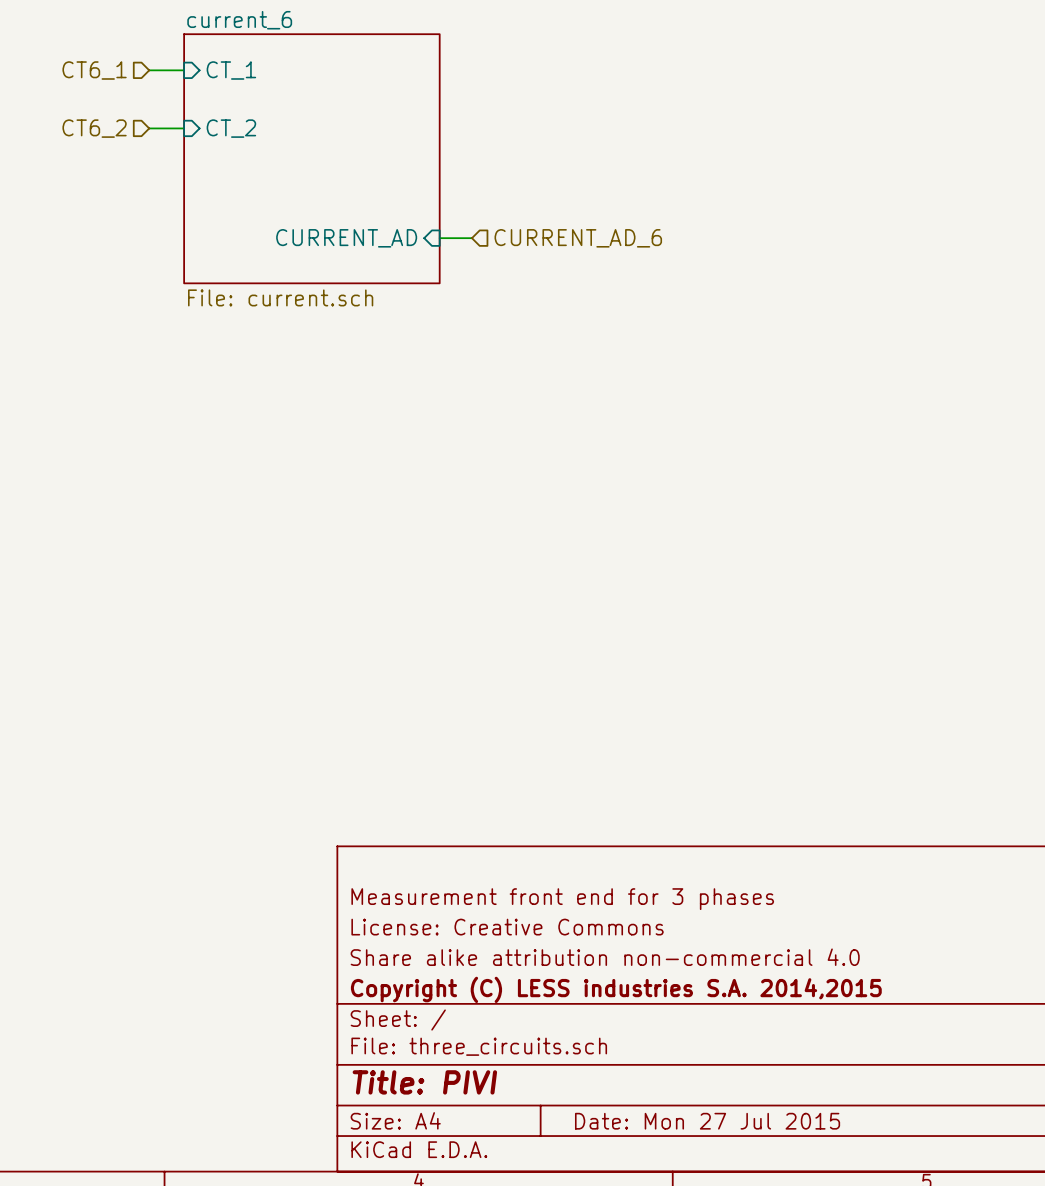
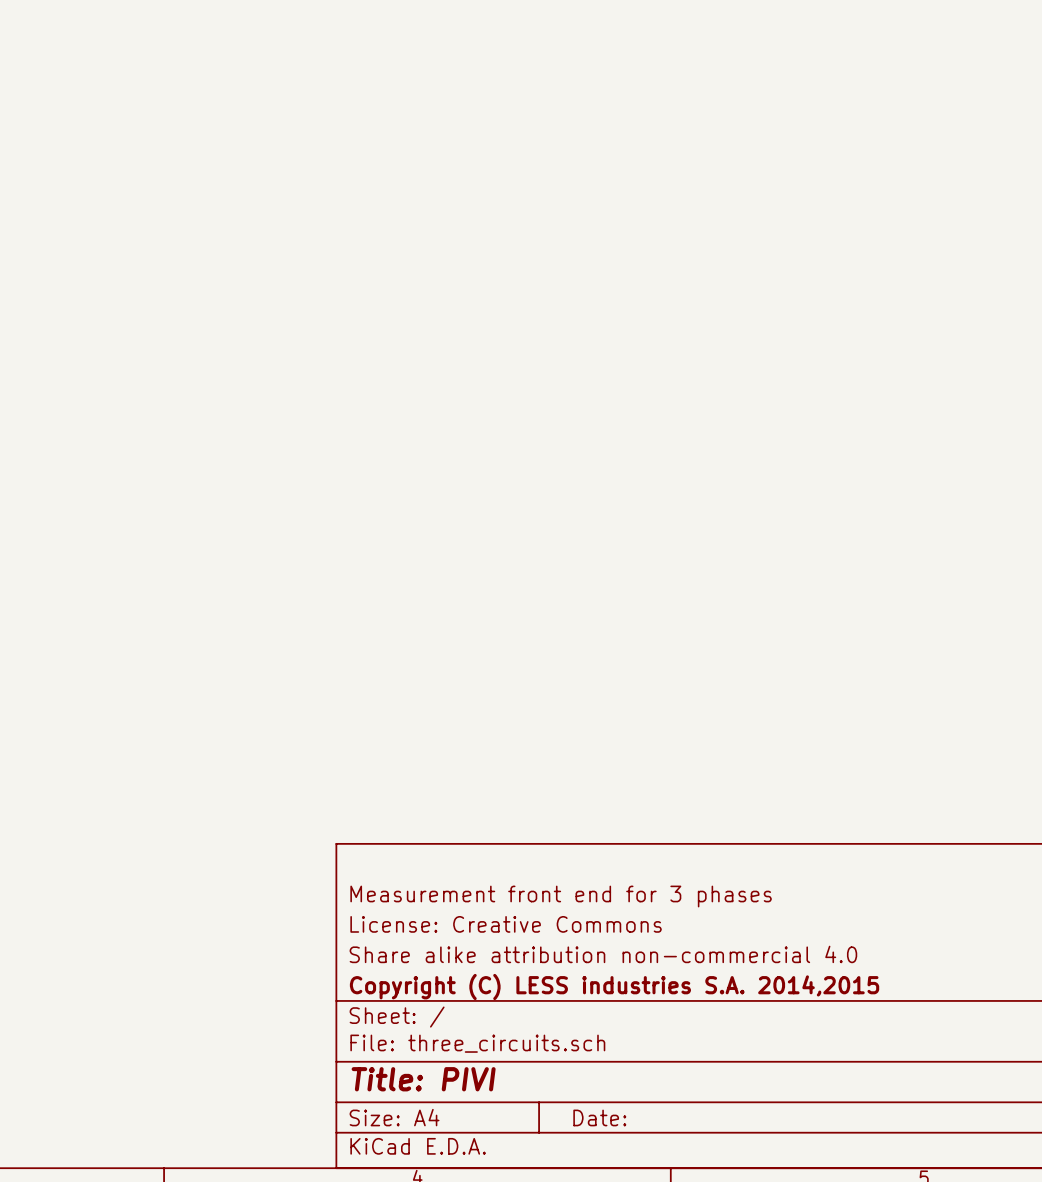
hierarchical label: CT6_1 (94, 70) -> none
wire: (149, 70) (184, 70) -> none
sheet pin: CT_1 (231, 70) -> none
hierarchical label: CT6_2 (94, 128) -> none
wire: (149, 128) (184, 128) -> none
sheet pin: CT_2 (231, 128) -> none
sheet current_6: File: current.sch (311, 158) -> none
sheet pin: CURRENT_AD (346, 238) -> none
wire: (439, 238) (471, 238) -> none
hierarchical label: CURRENT_AD_6 (578, 238) -> none
title block: Date: Mon 27 Jul 2015 (707, 1121) -> Date: (599, 1117)

